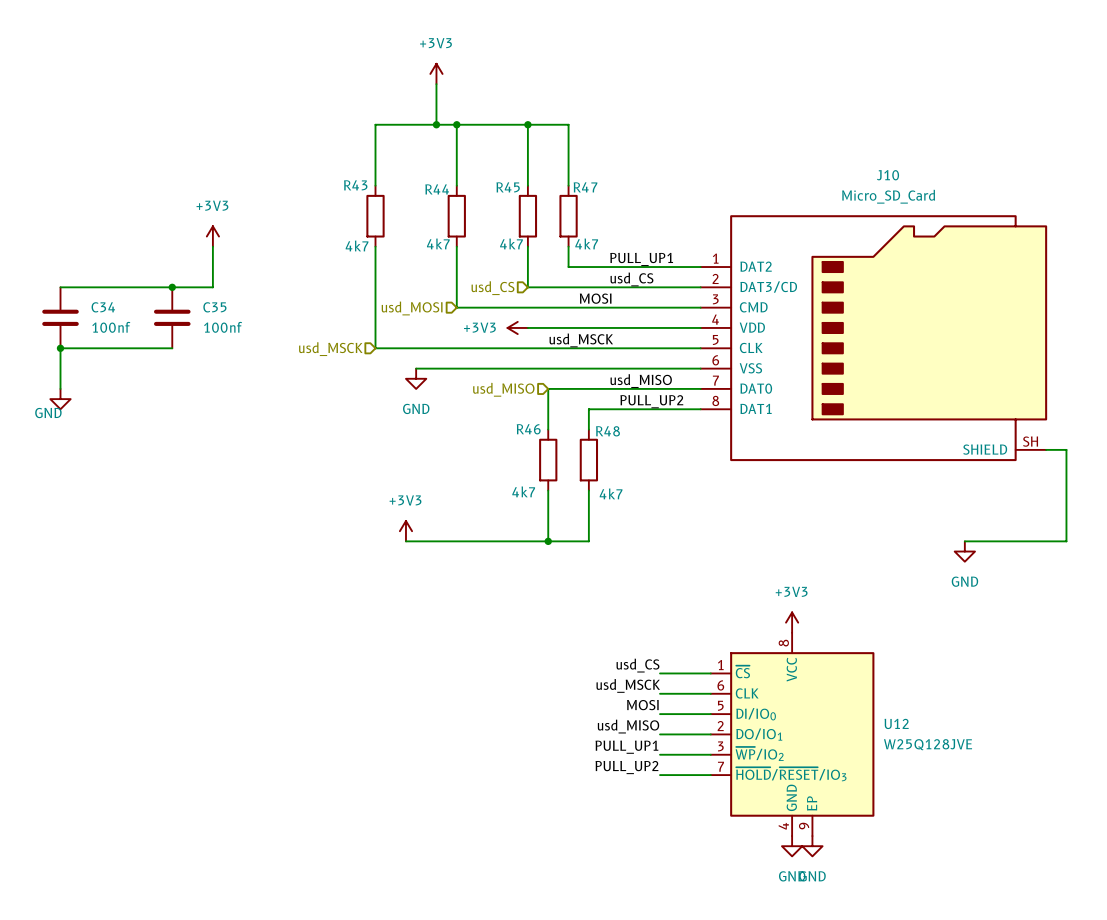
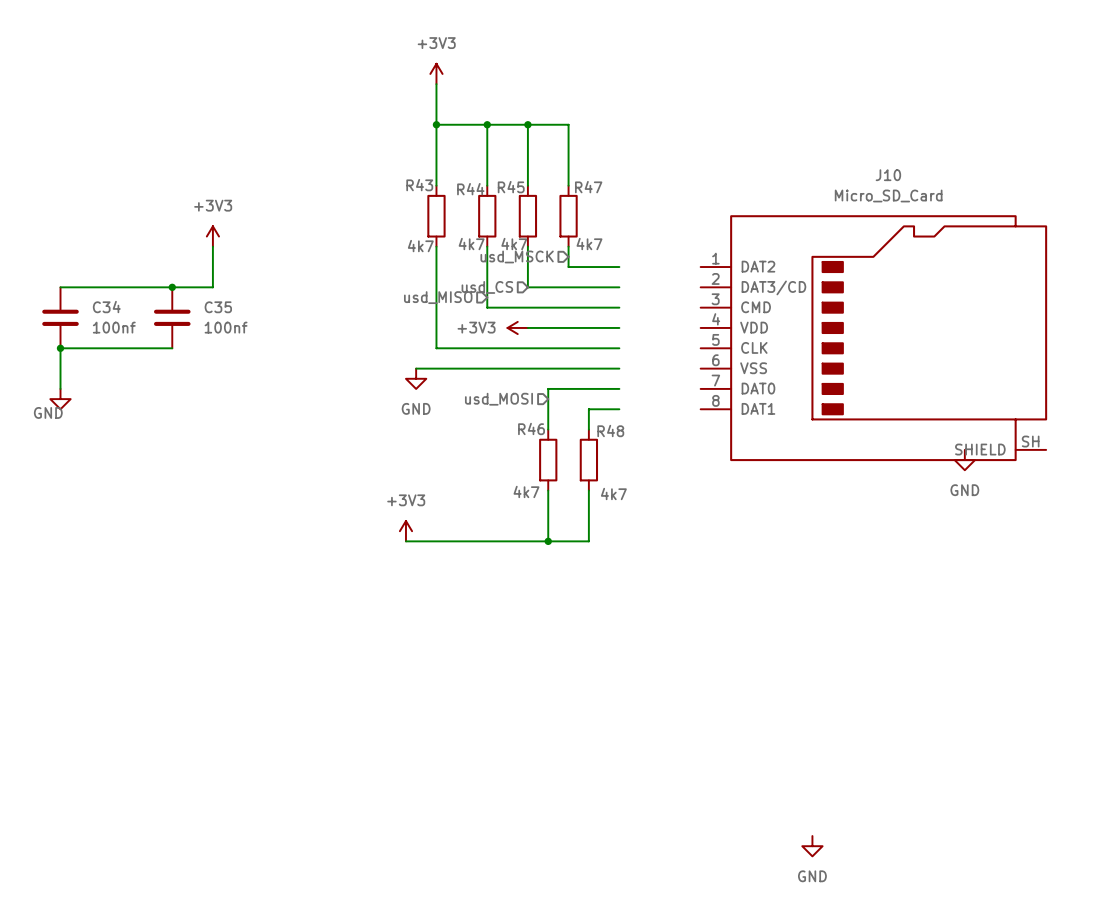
wire: (436, 124) (375, 124) (375, 185) -> (436, 124) (436, 185)
wire: (456, 124) (456, 185) -> (487, 124) (487, 185)
junction position: (456, 124) -> (487, 124)
R43 position: (375, 216) -> (436, 216)
R44 position: (456, 216) -> (487, 216)
wire: (375, 246) (375, 348) (436, 348) -> (436, 246) (436, 348)
wire: (456, 246) (456, 307) (487, 307) -> (487, 246) (487, 307)
hierarchical label: none -> usd_MSCK (517, 256)
label: PULL_UP1 (641, 259) -> none
wire: (619, 267) (700, 267) -> none
label: usd_CS (631, 279) -> none
wire: (619, 287) (700, 287) -> none
label: MOSI (595, 298) -> none
wire: (619, 307) (700, 307) -> none
hierarchical label position: usd_MOSI (412, 308) -> usd_MOSI (498, 399)
wire: (619, 327) (700, 327) -> none
label: usd_MSCK (581, 340) -> none
wire: (619, 348) (700, 348) -> none
hierarchical label: usd_MSCK (330, 349) -> none
wire: (619, 368) (700, 368) -> none
label: usd_MISO (641, 381) -> none
wire: (619, 388) (700, 388) -> none
hierarchical label position: usd_MISO (503, 389) -> usd_MISO (438, 297)
label: PULL_UP2 (651, 401) -> none
wire: (619, 409) (700, 409) -> none
wire: (1046, 449) (1066, 449) (1066, 541) (964, 541) -> none
power symbol position: GND (964, 551) -> GND (964, 460)
power symbol: +3V3 (792, 622) -> none
label: usd_CS (637, 665) -> none
wire: (660, 673) (710, 673) -> none
label: usd_MSCK (628, 685) -> none
wire: (660, 693) (710, 693) -> none
label: MOSI (642, 705) -> none
wire: (660, 714) (710, 714) -> none
label: usd_MISO (628, 726) -> none
wire: (660, 734) (710, 734) -> none
U12: W25Q128JVE (792, 734) -> none
label: PULL_UP1 (626, 747) -> none
wire: (660, 754) (710, 754) -> none
label: PULL_UP2 (626, 767) -> none
wire: (660, 775) (710, 775) -> none
power symbol: GND (792, 846) -> none

